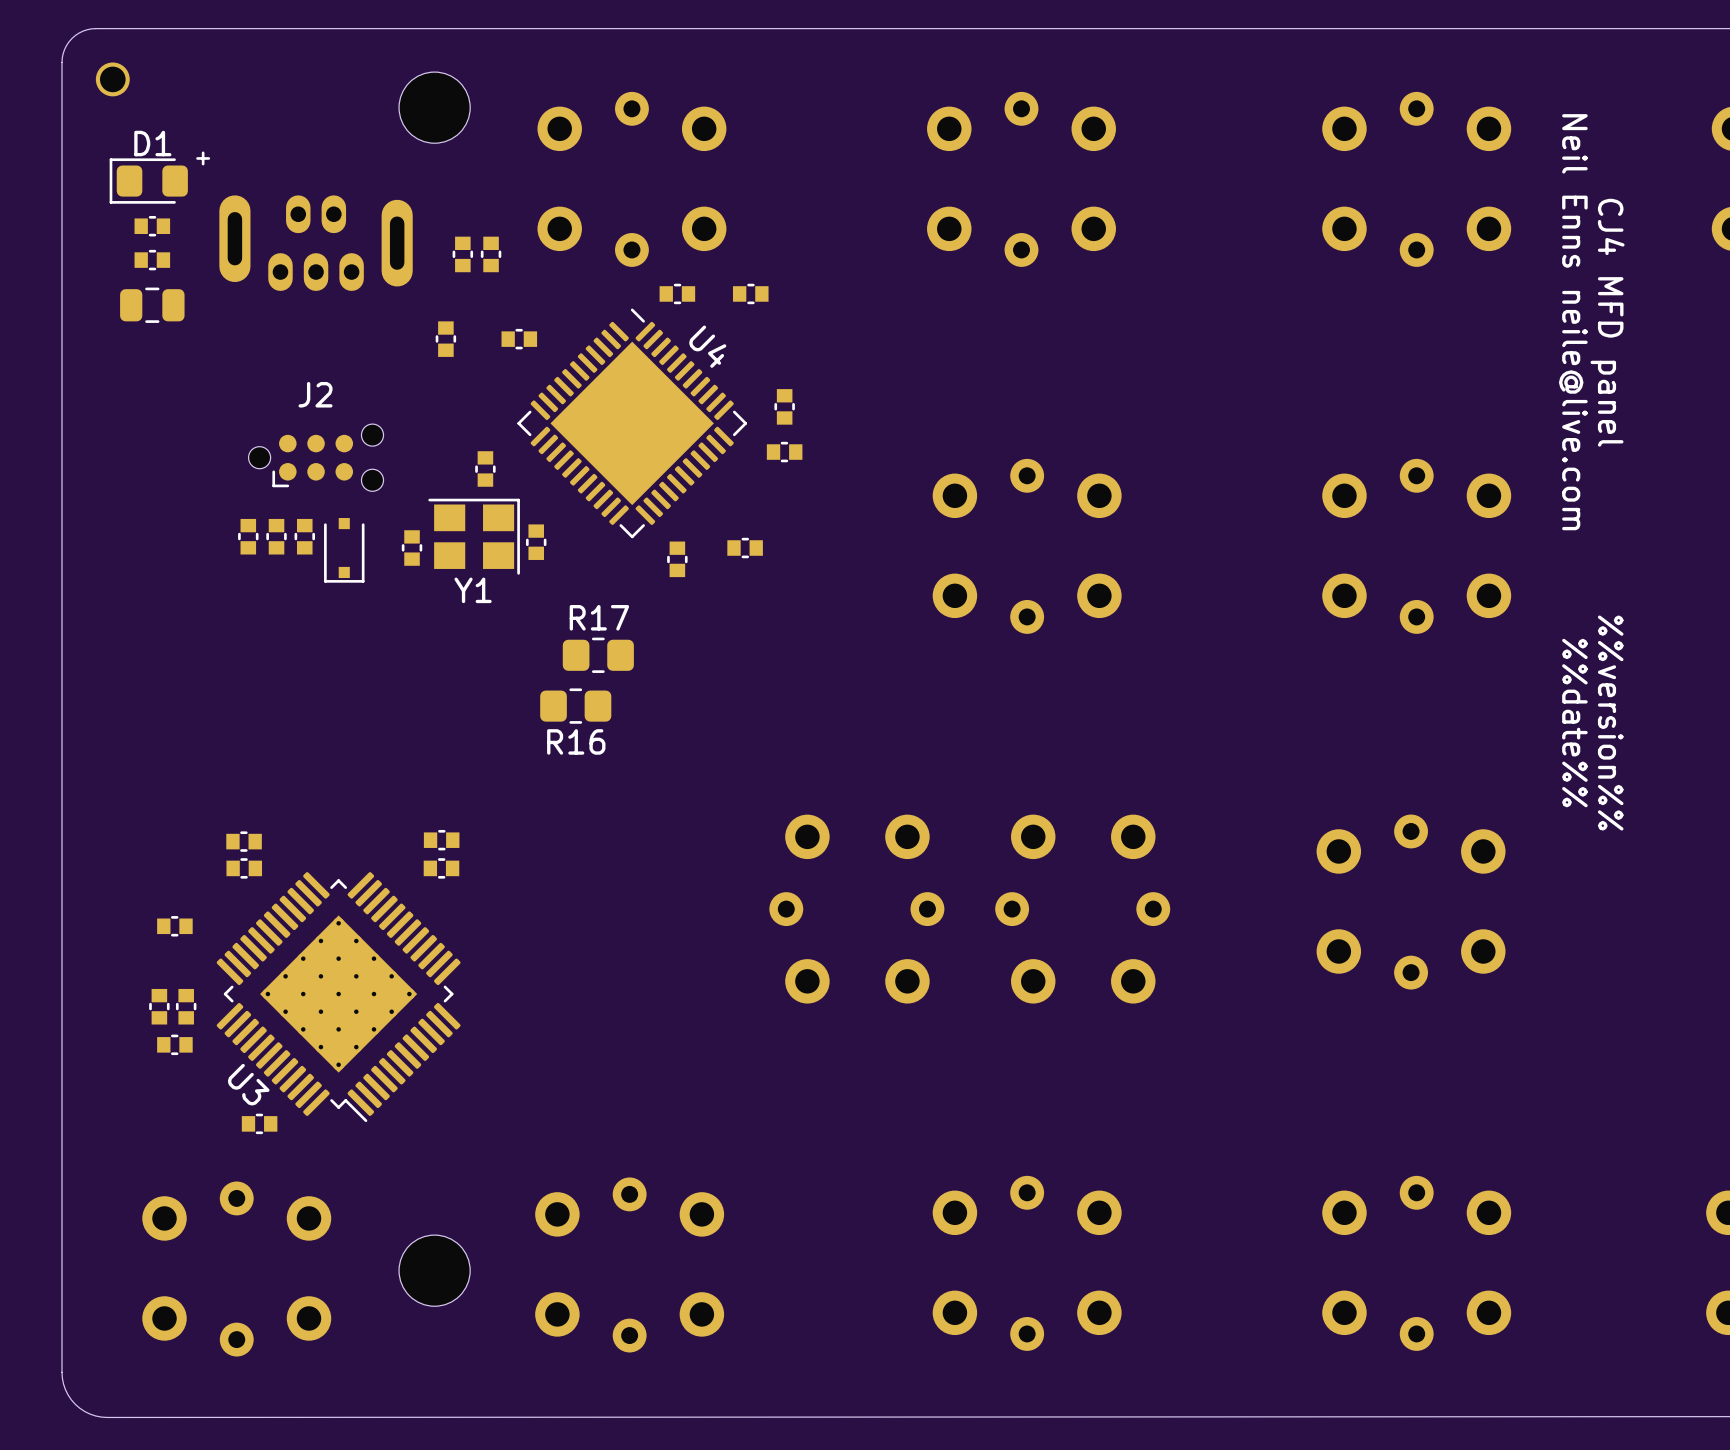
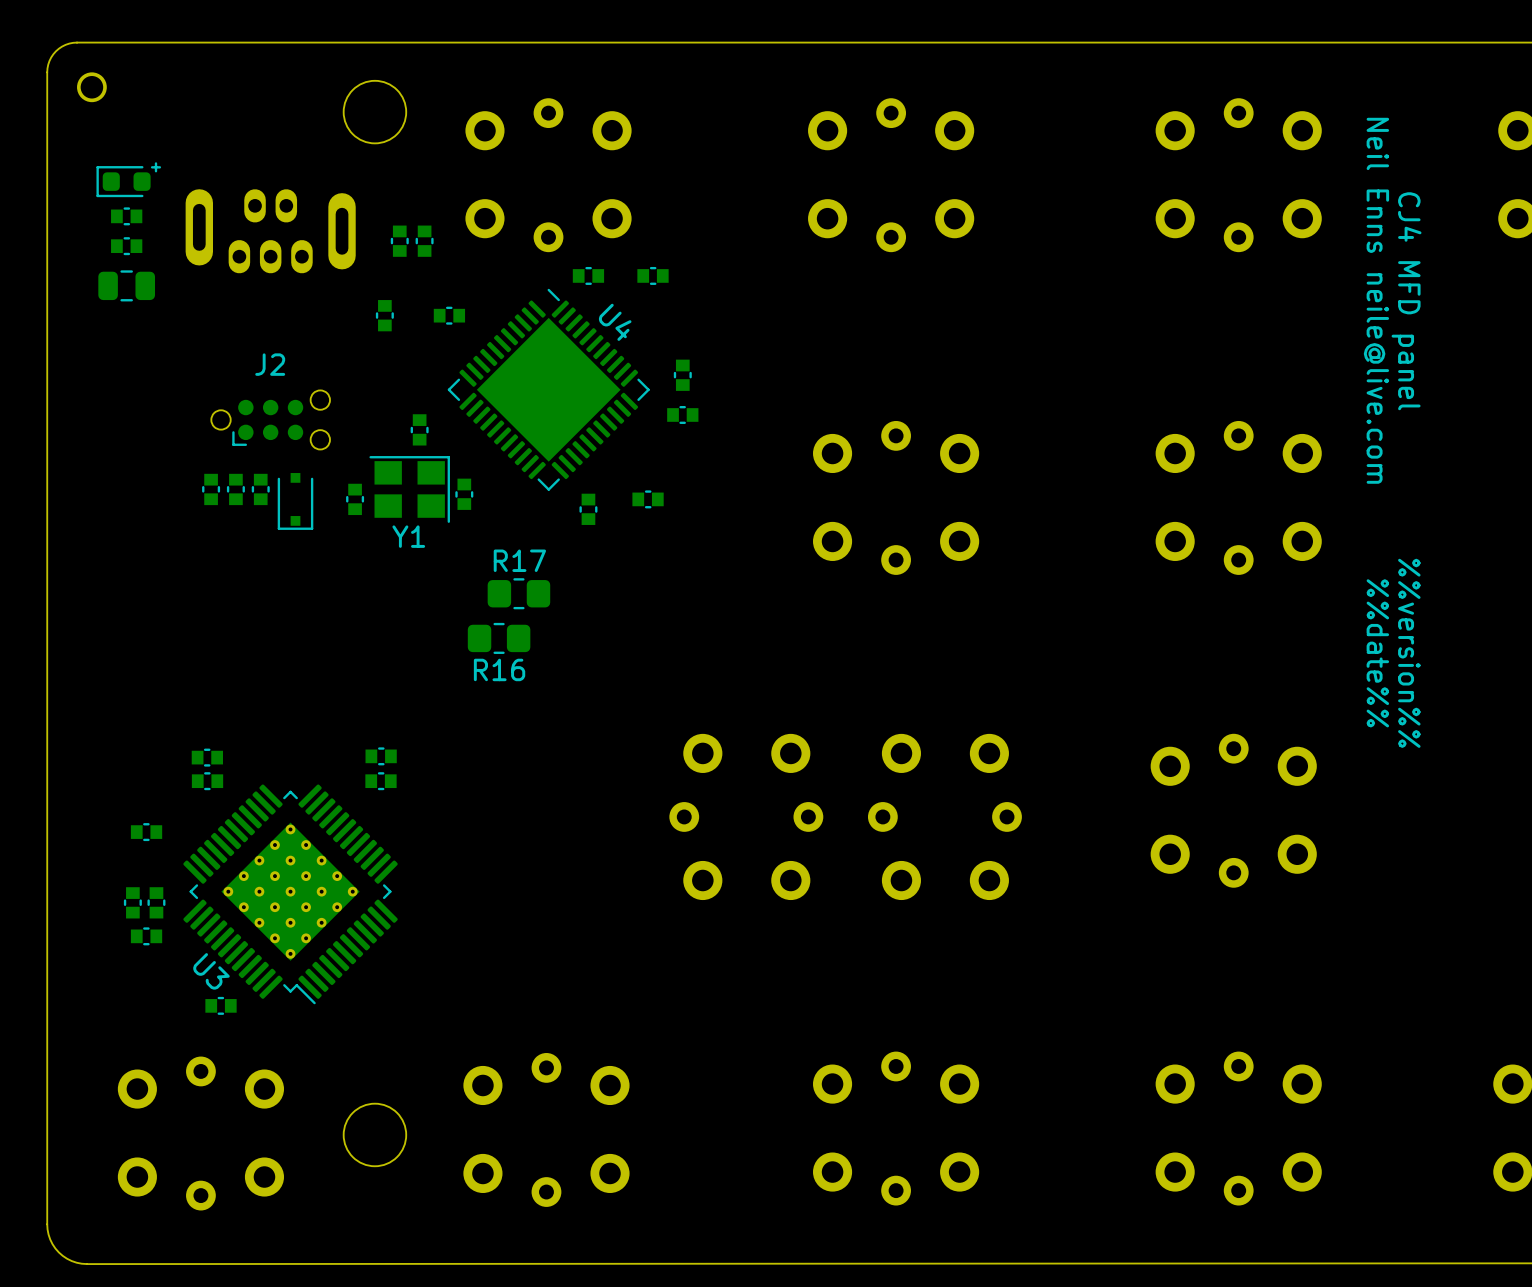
line: (203, 152) (203, 164) -> none
line: (208, 158) (197, 158) -> none
D1: (148, 181) -> none
part: none -> (128, 179)

